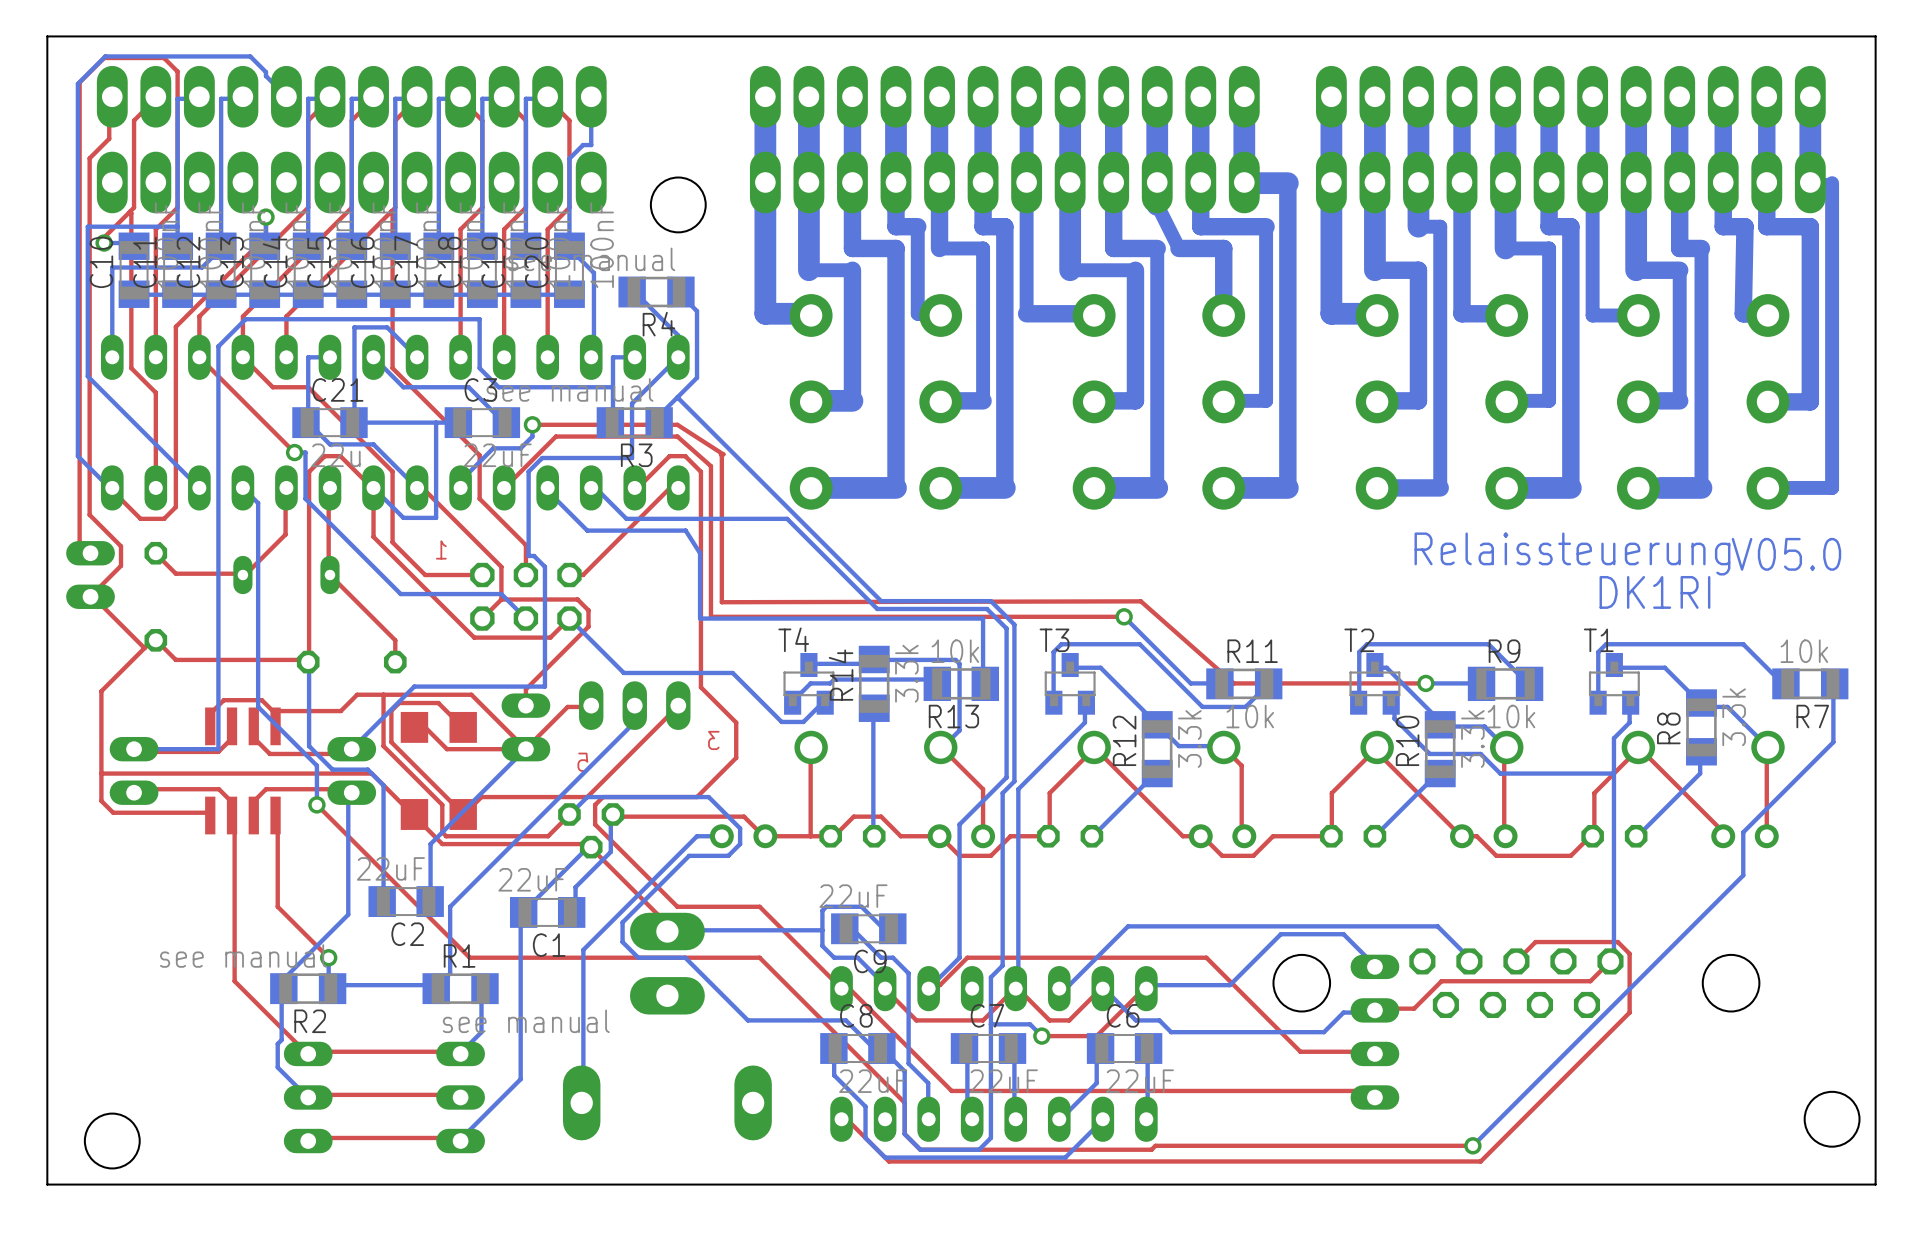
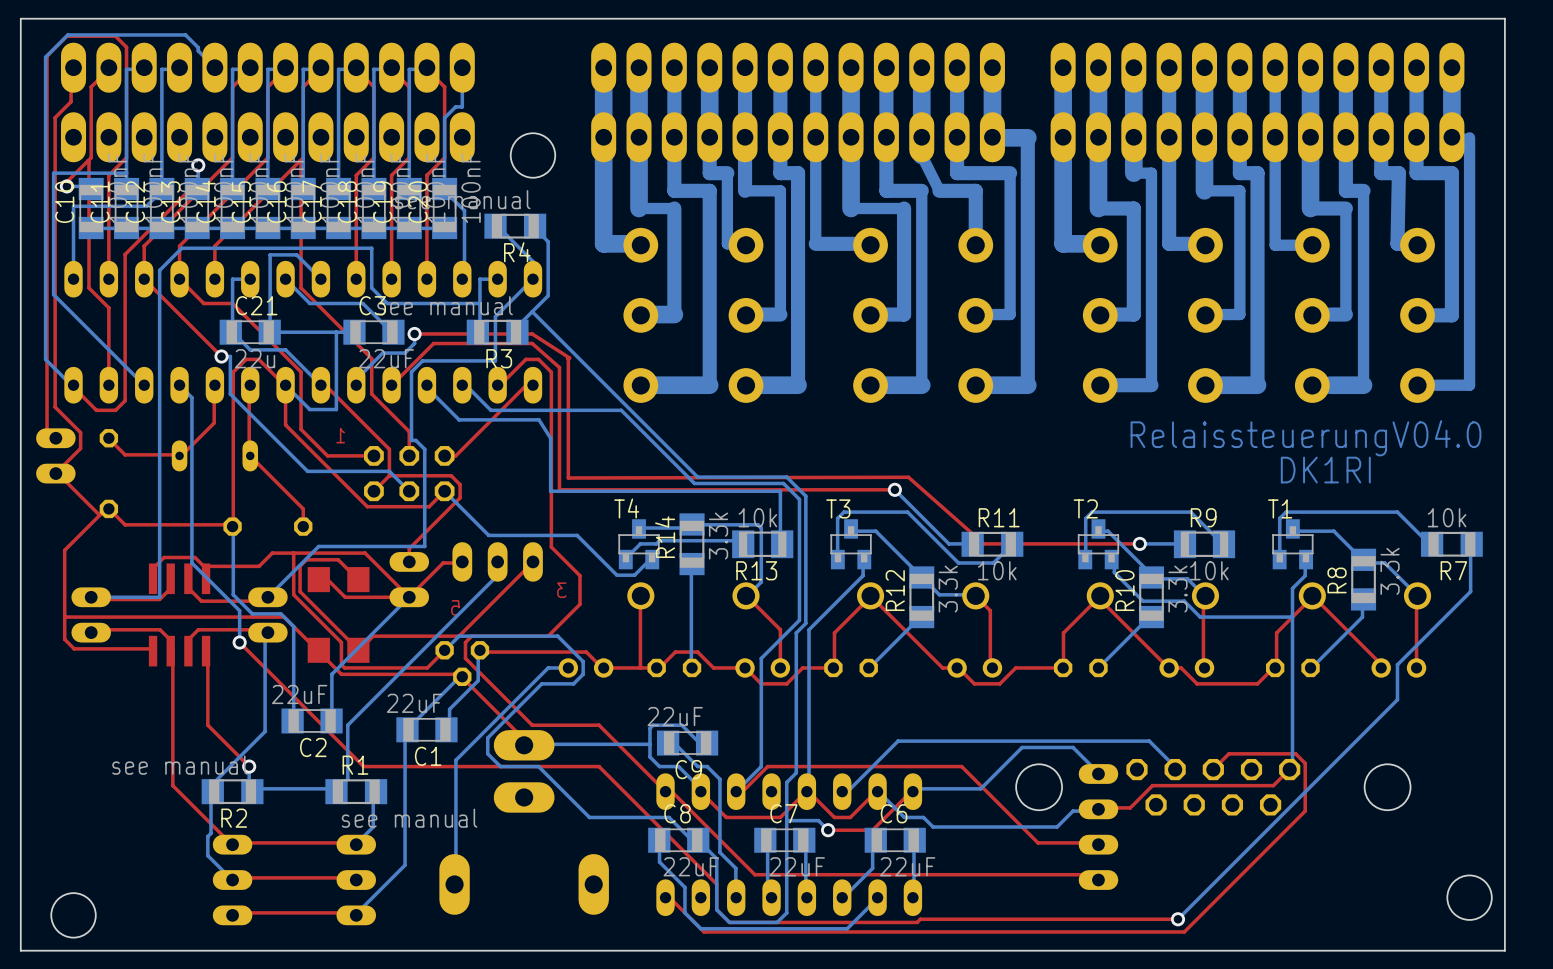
text: V05.0 (1786, 554) -> V04.0 (1436, 434)

